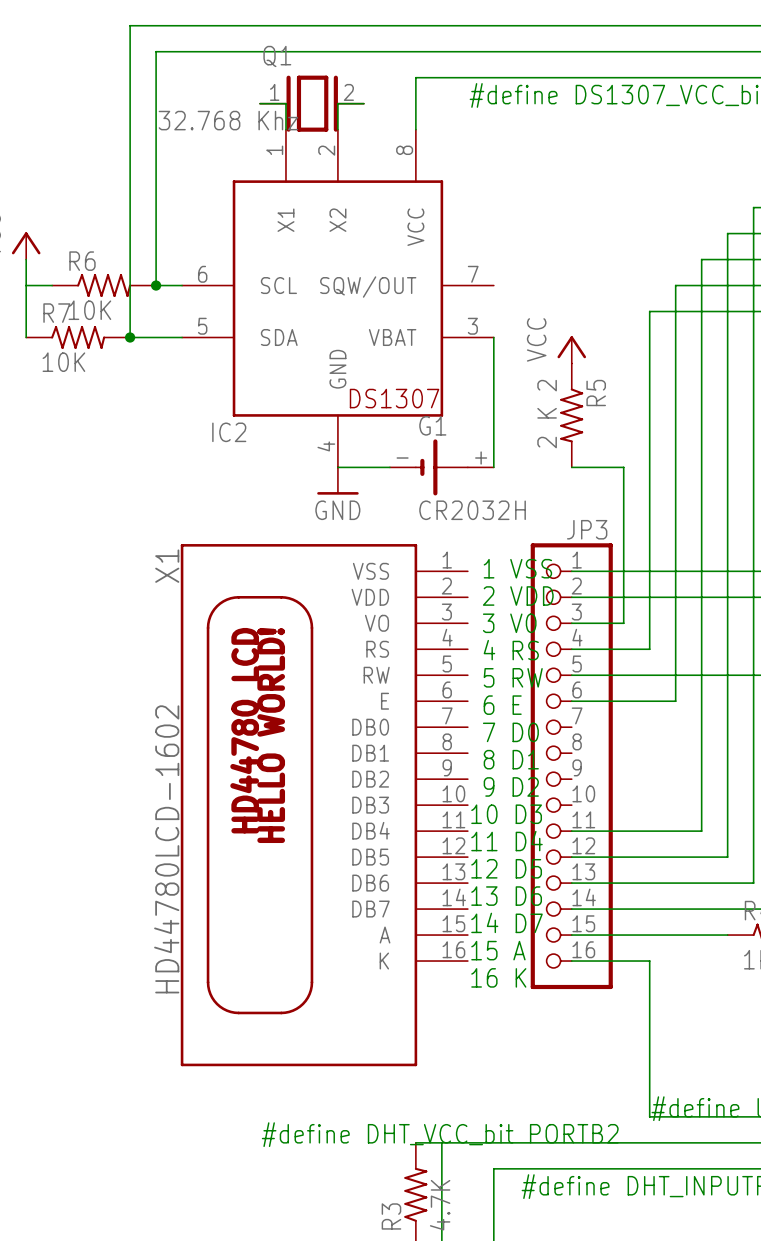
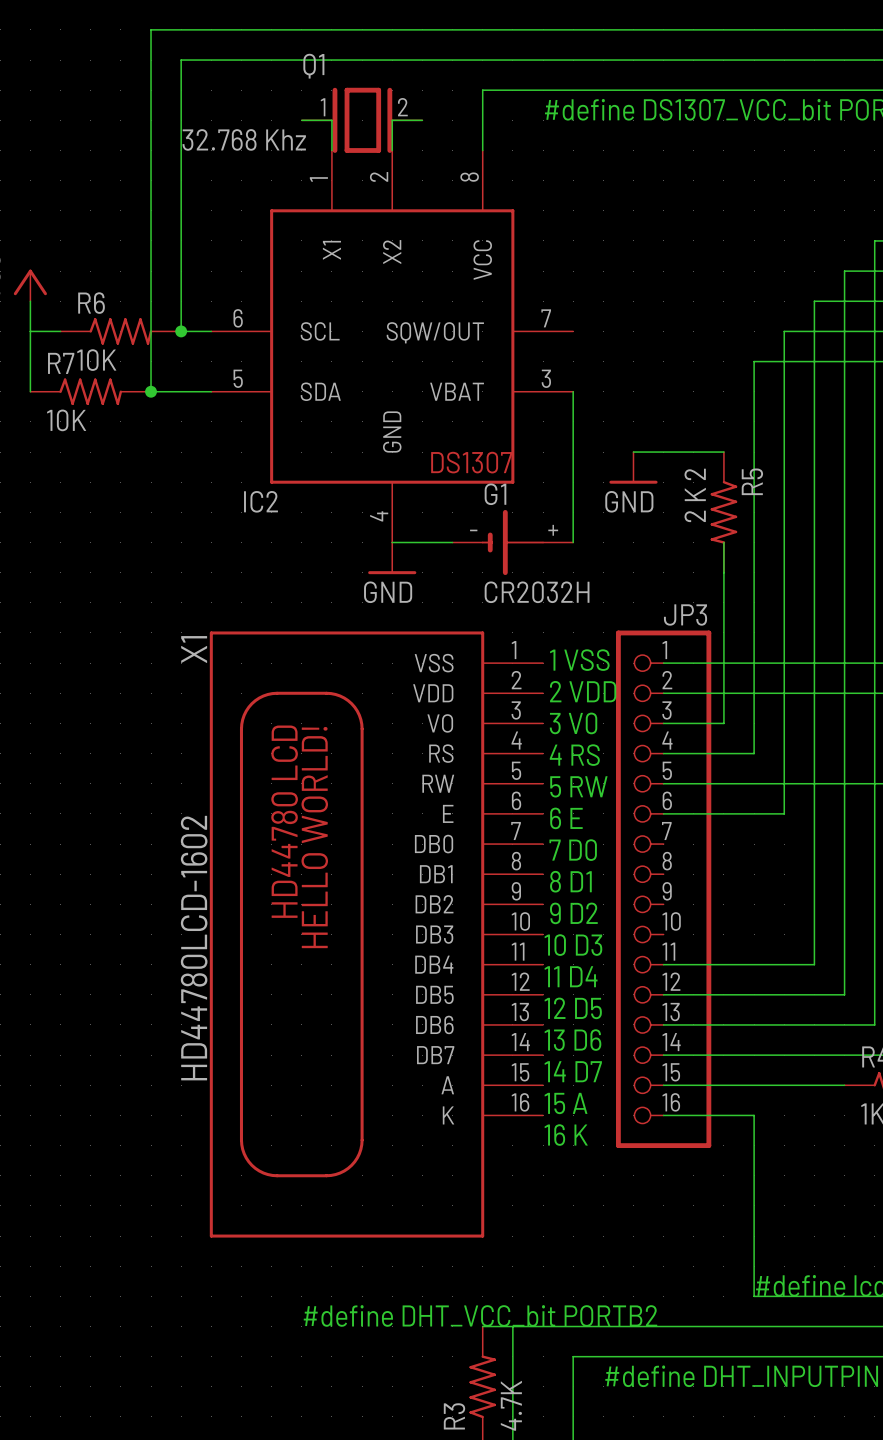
power symbol: VCC (571, 349) -> none
wire: none -> (633, 452) (723, 452)
power symbol: none -> GND (633, 467)
R5 position: (571, 415) -> (723, 512)
wire: (571, 467) (623, 467) -> none

